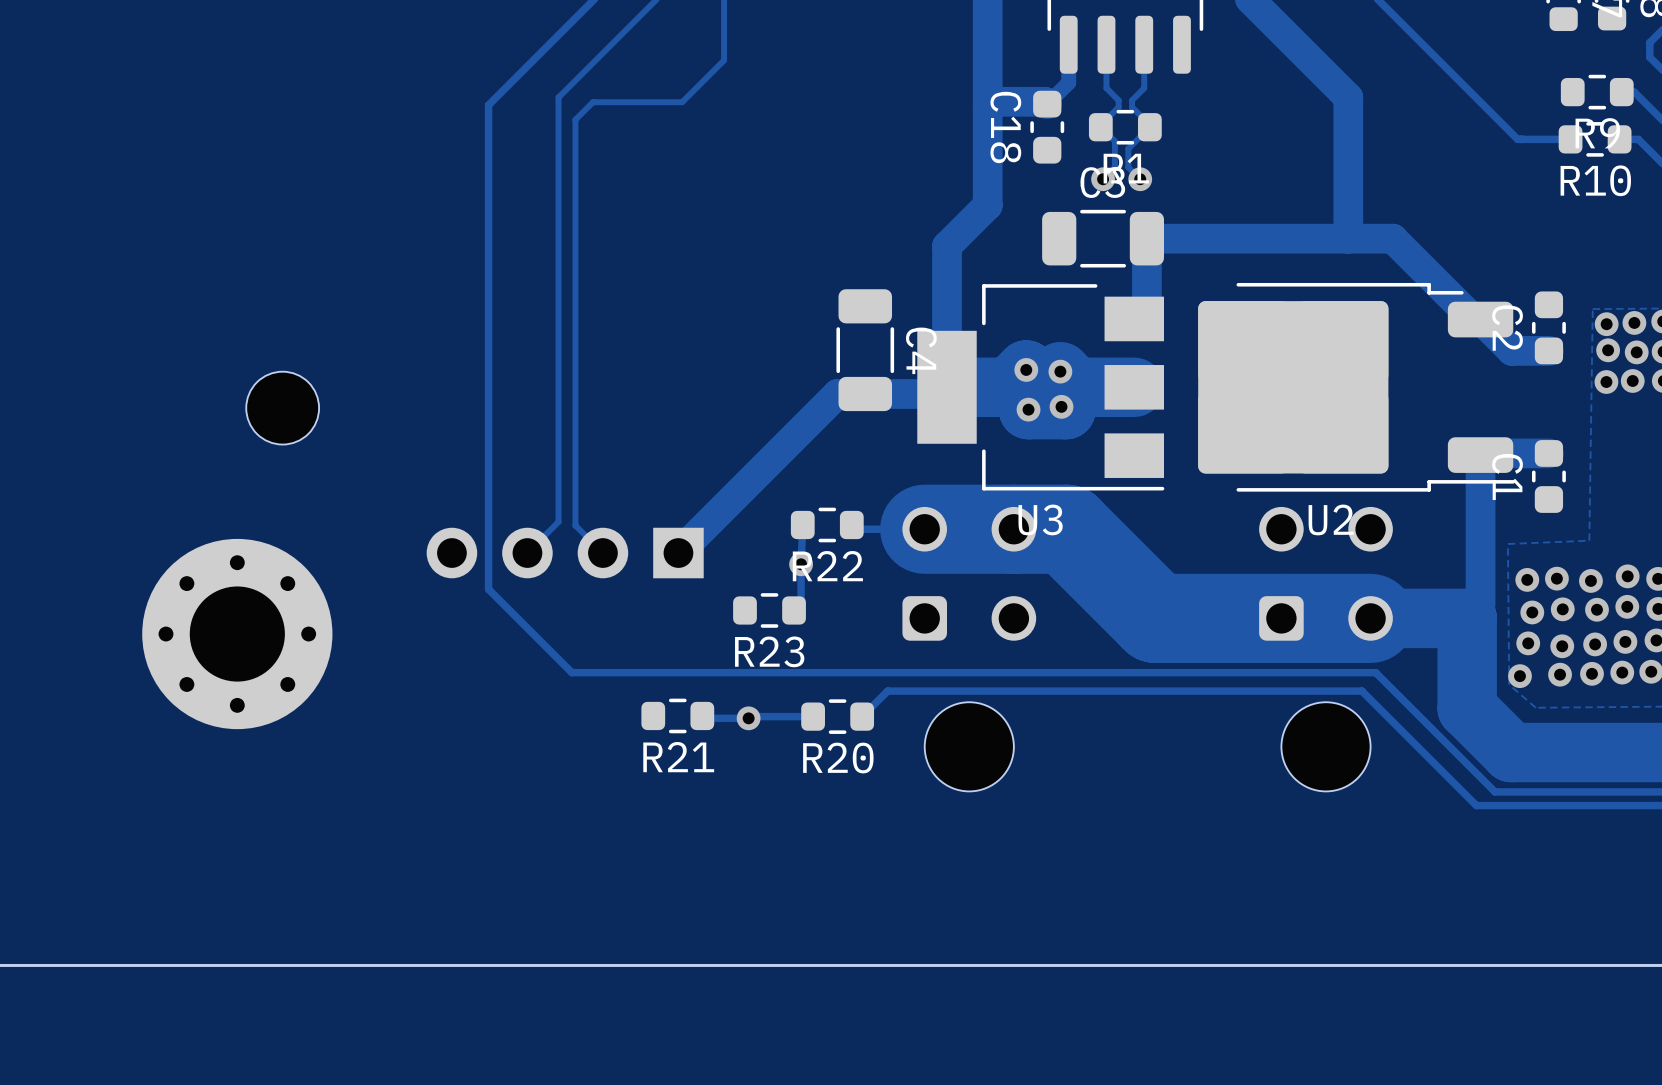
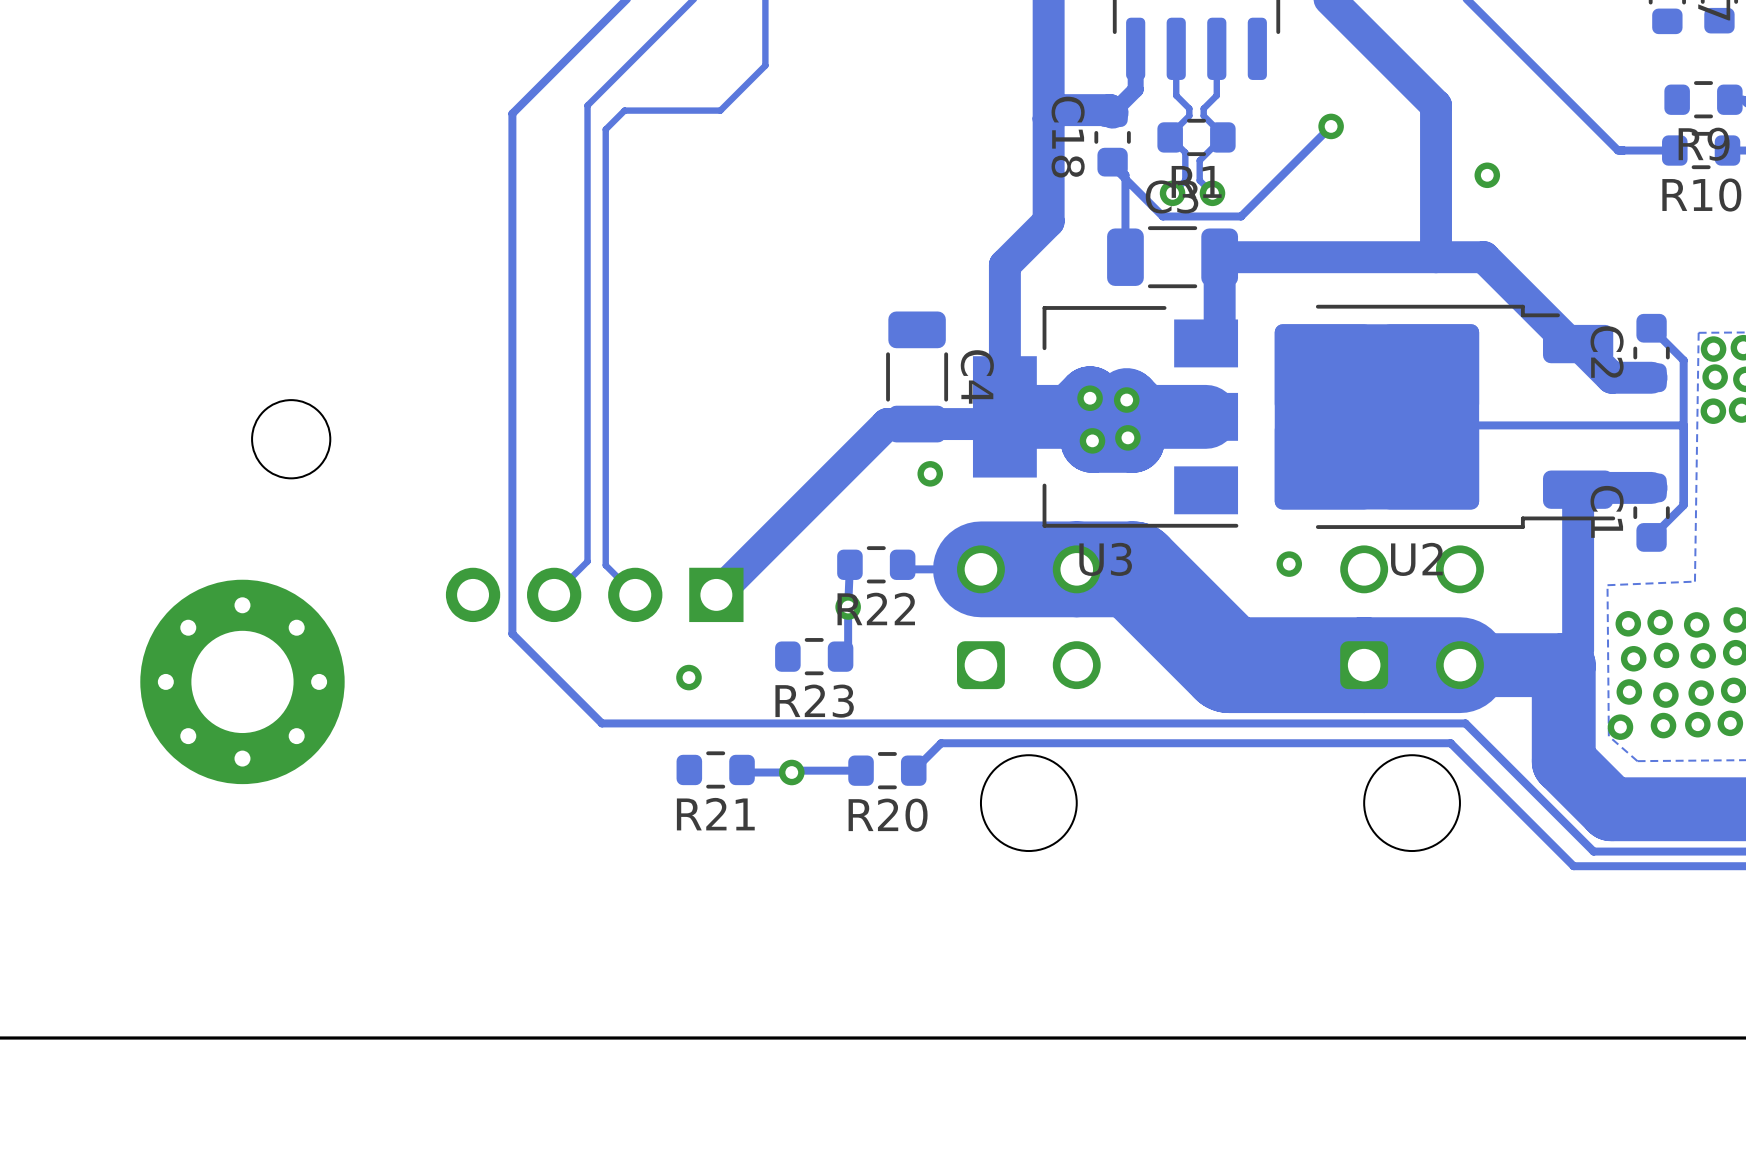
track: none -> (1331, 126) (1241, 216) (1162, 216) (1112, 166) (1112, 162) (1125, 175) (1125, 257)
via: none -> (1331, 126)
via: none -> (1487, 175)
track: none -> (1651, 328) (1683, 360) (1683, 505) (1651, 537)
track: none -> (1376, 416) (1385, 425) (1683, 425)
via: none -> (930, 473)
via: none -> (1289, 564)
via: none -> (688, 677)

